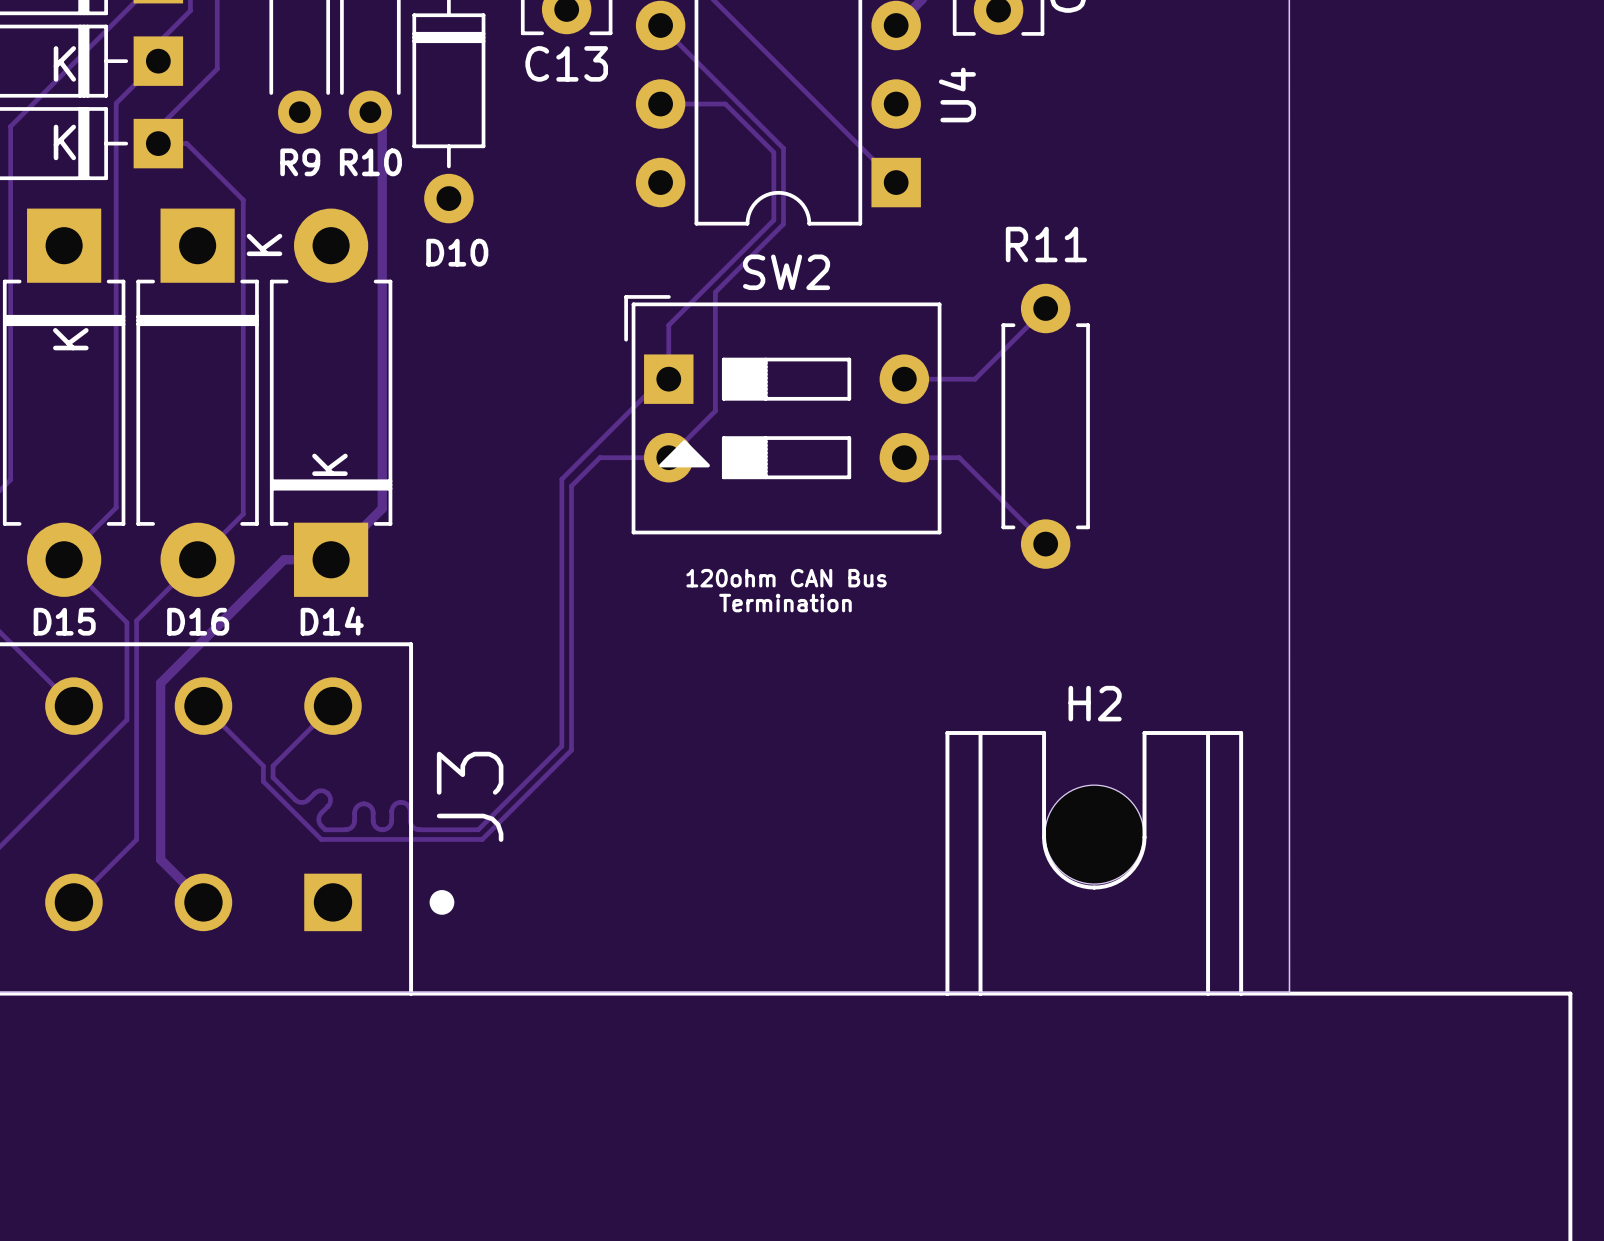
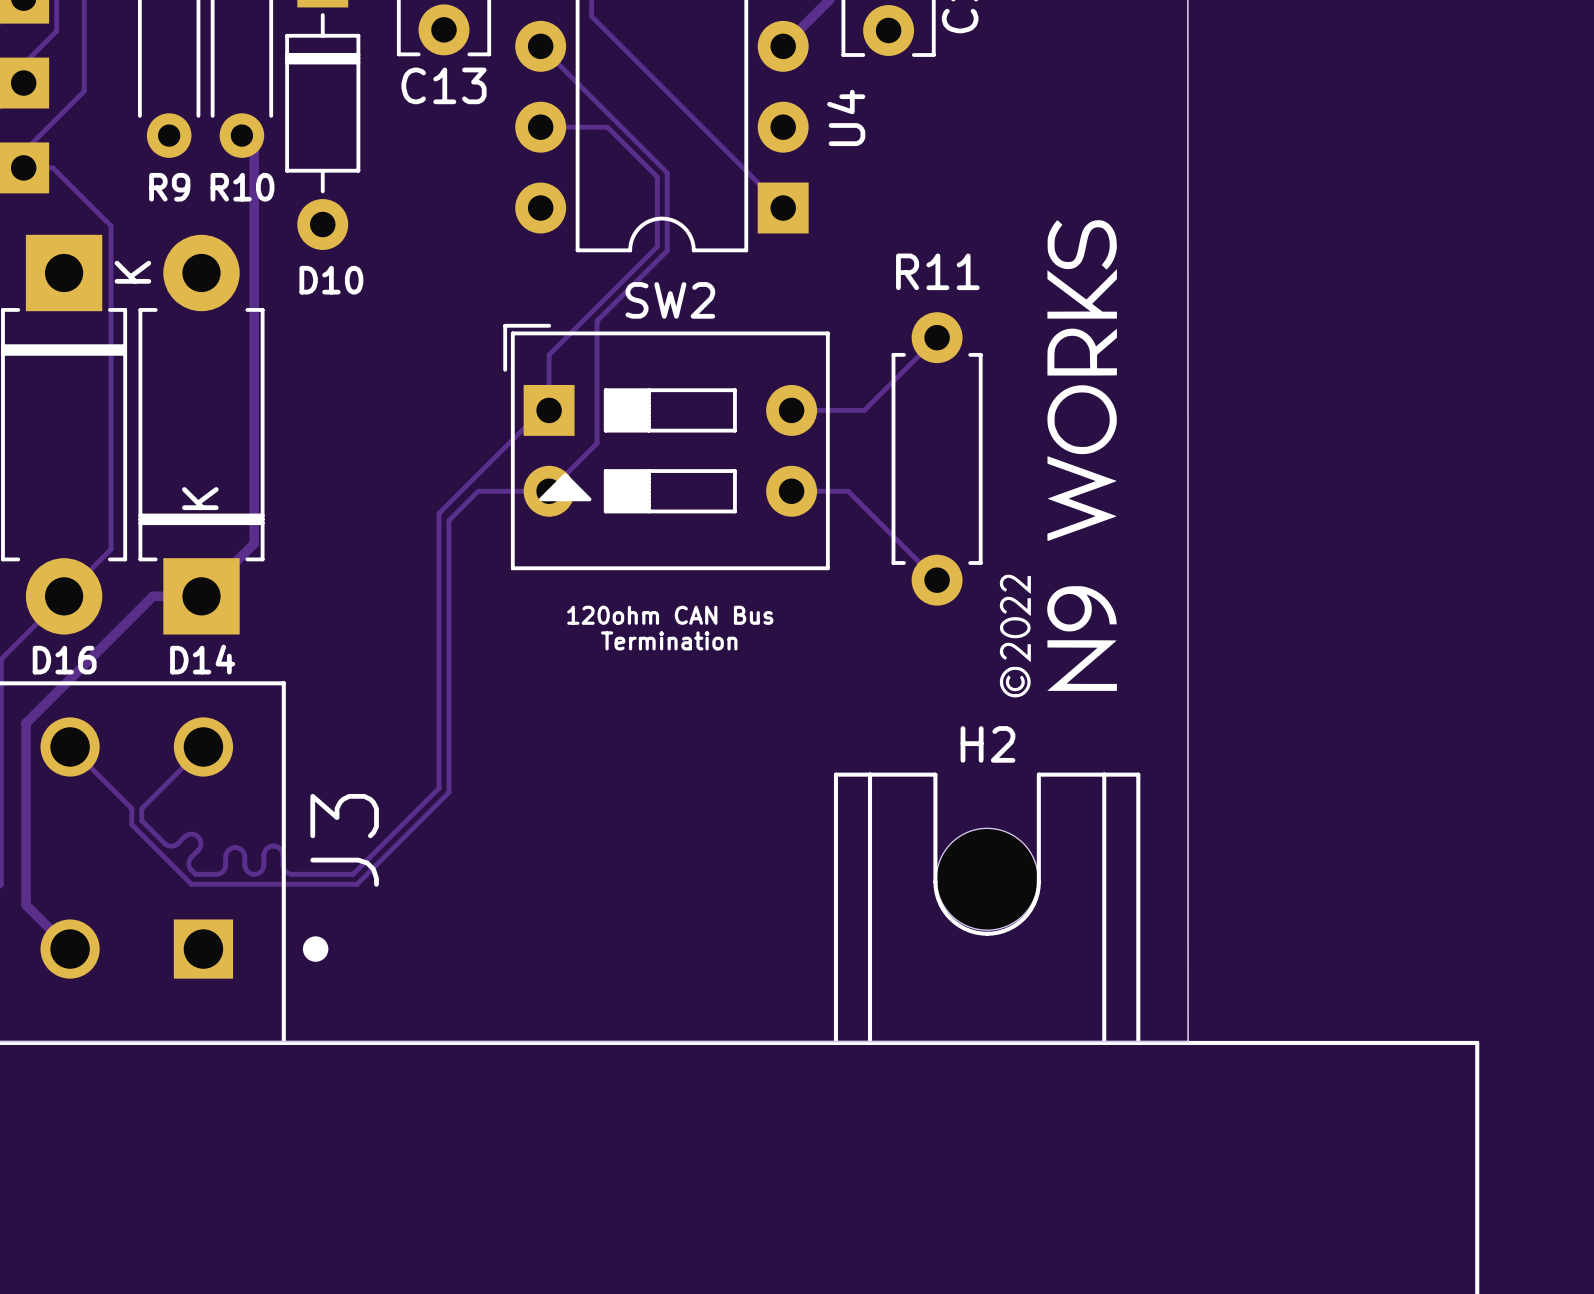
drawing: none -> [999, 220, 1117, 698]

